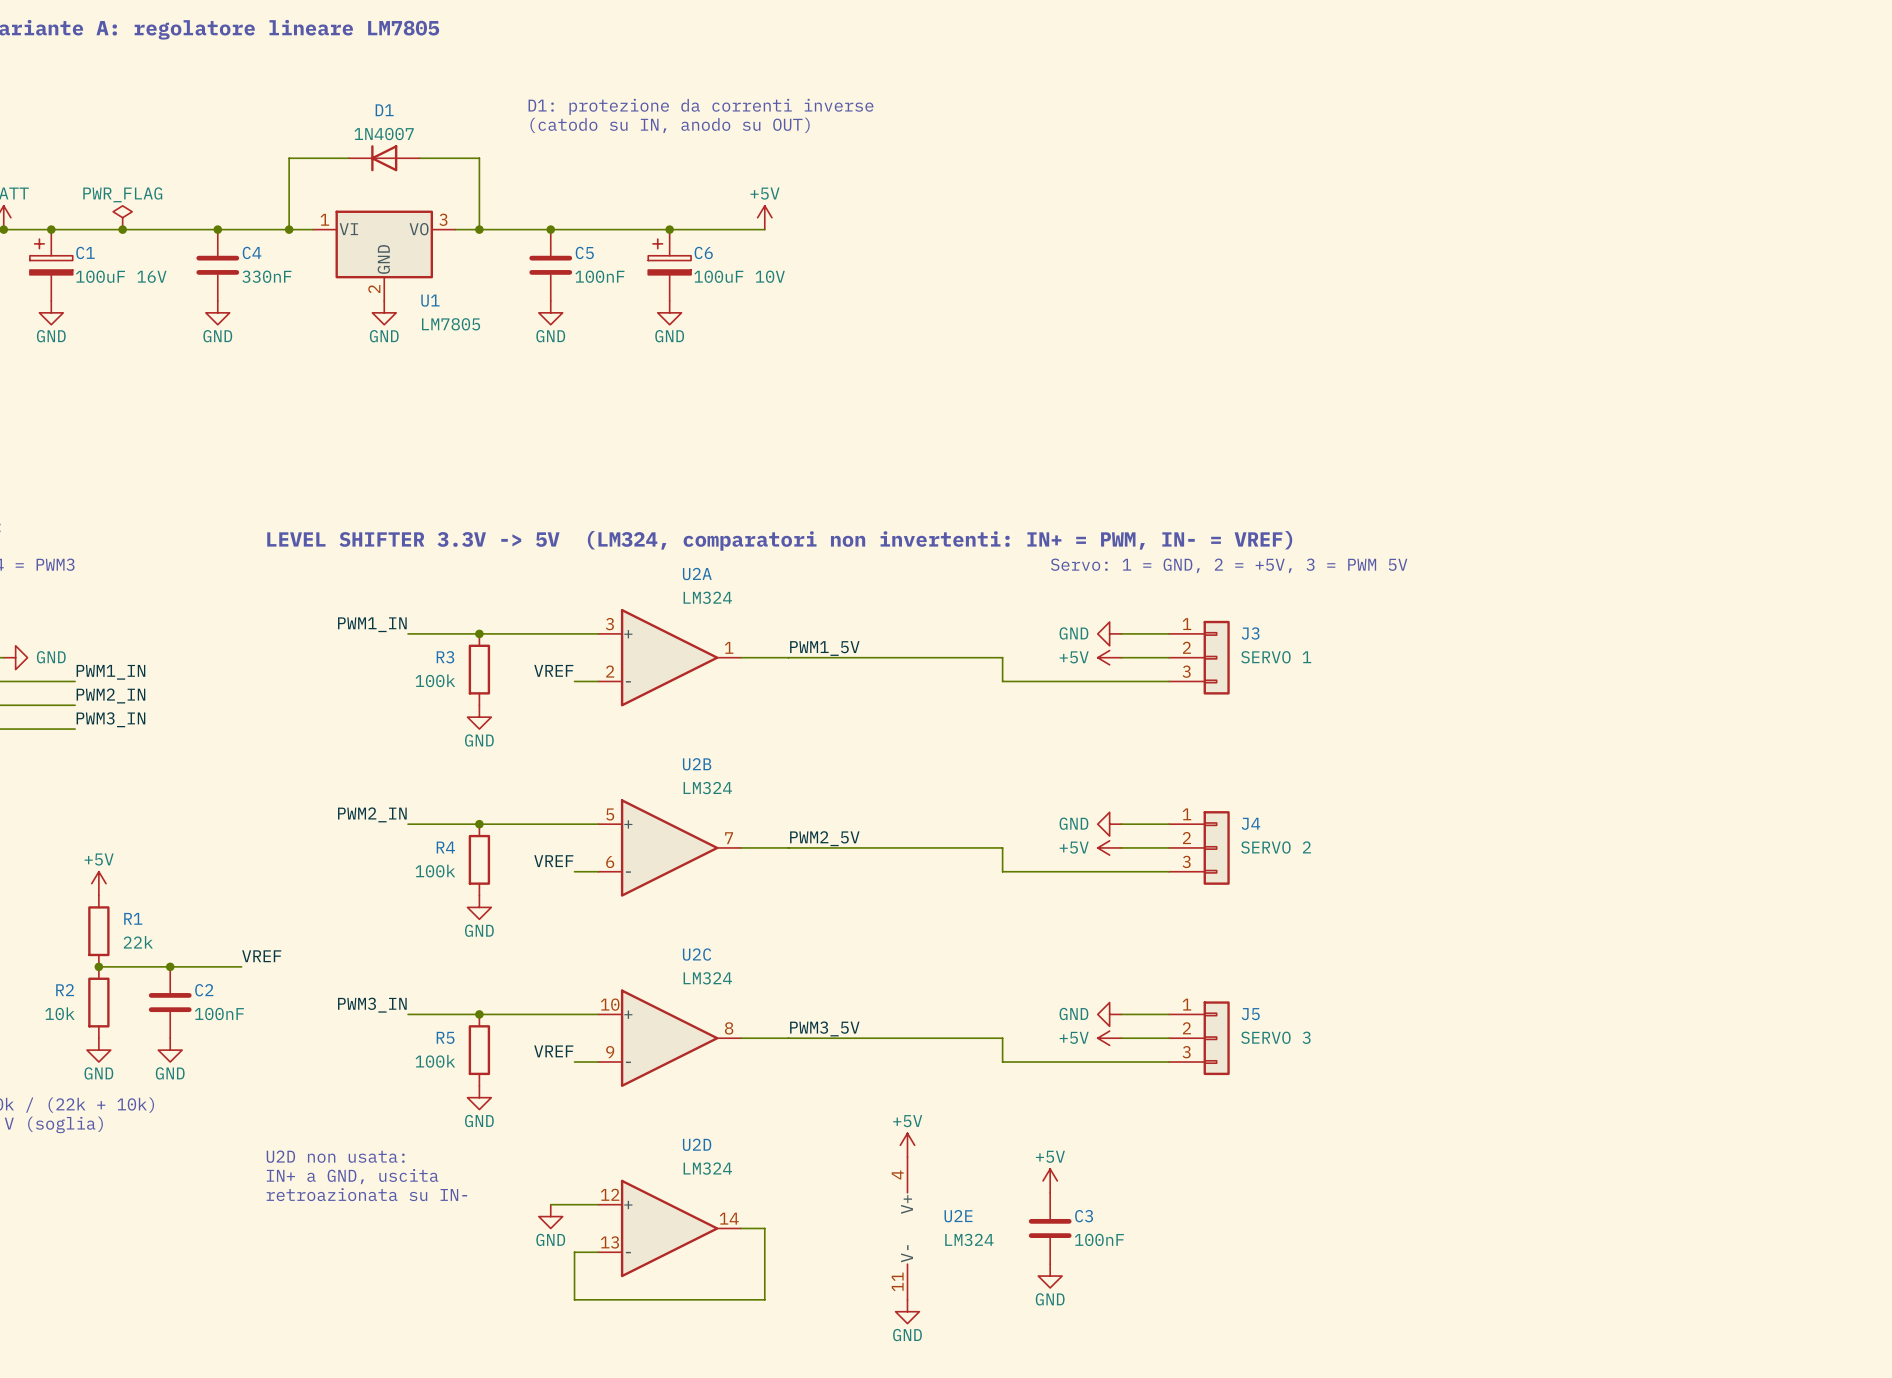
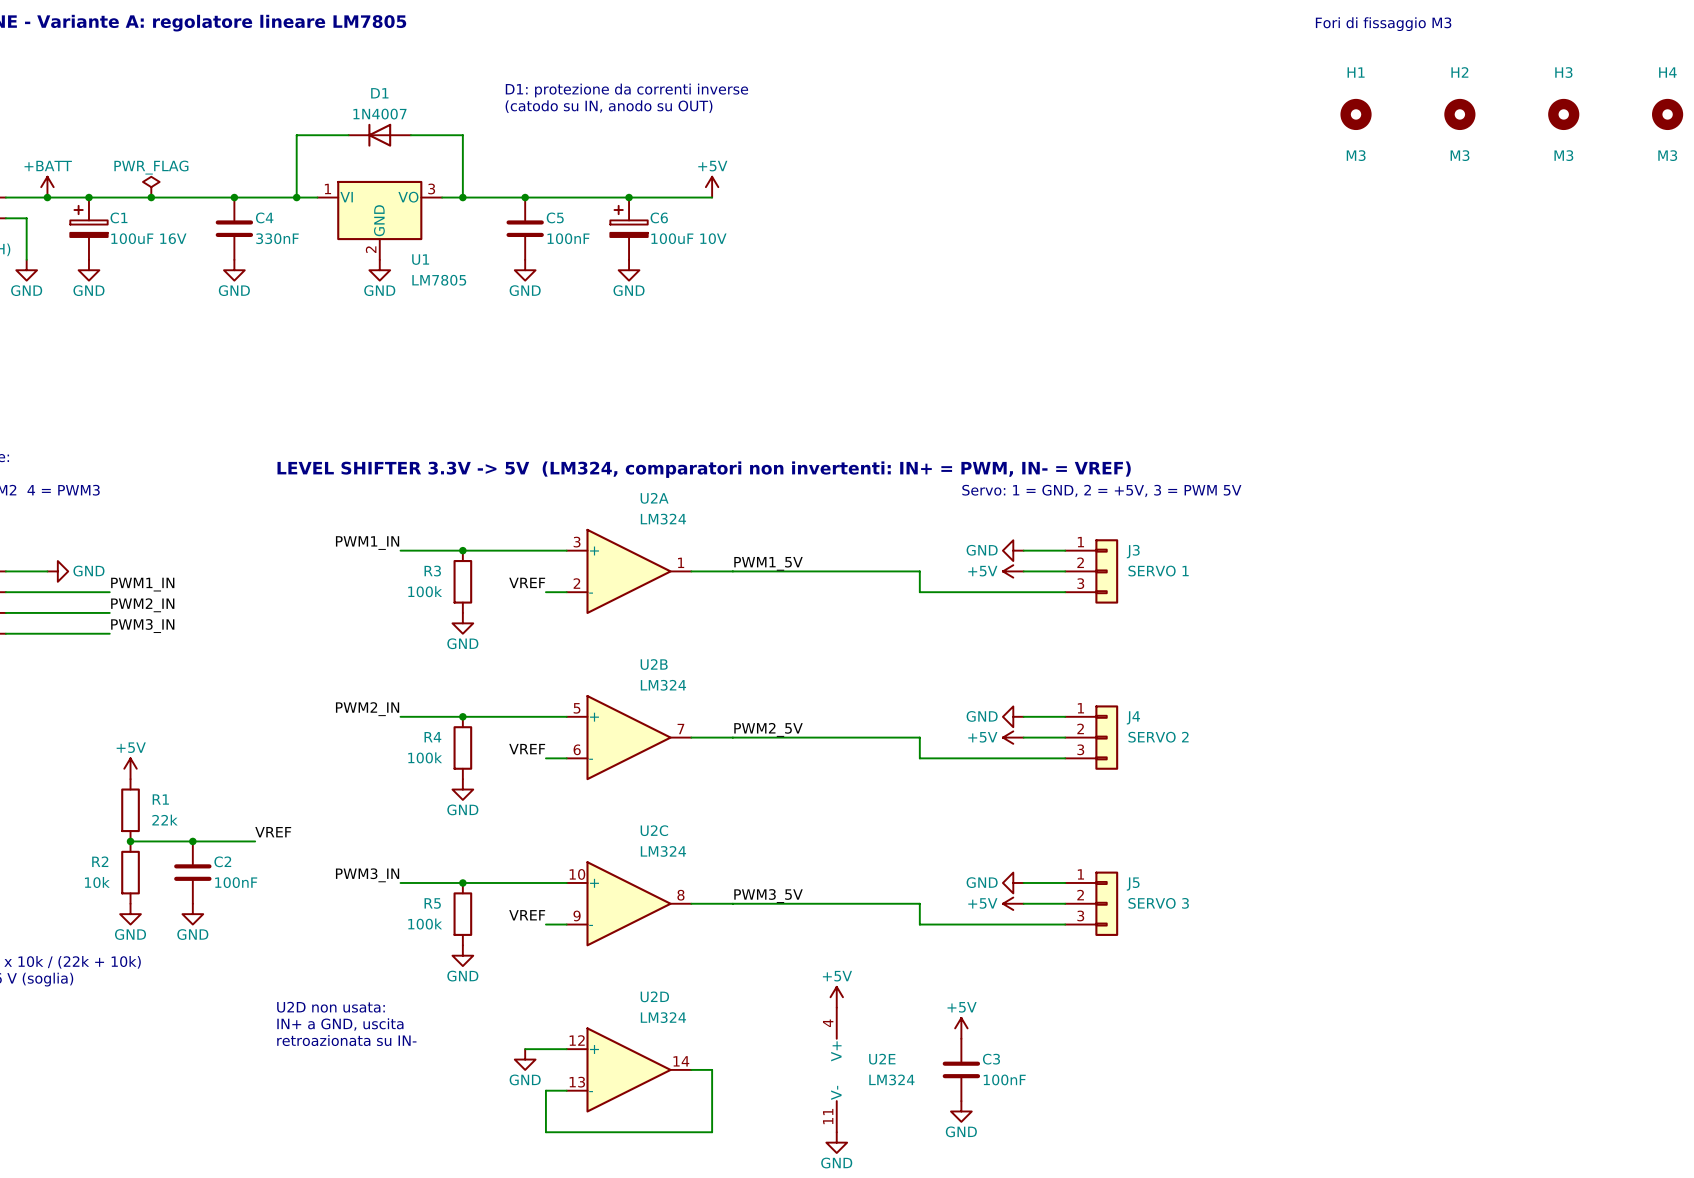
text: none -> Fori di fissaggio M3 (1383, 24)
H1: none -> M3 (1356, 114)
H2: none -> M3 (1459, 114)
H3: none -> M3 (1563, 114)
H4: none -> M3 (1667, 114)

